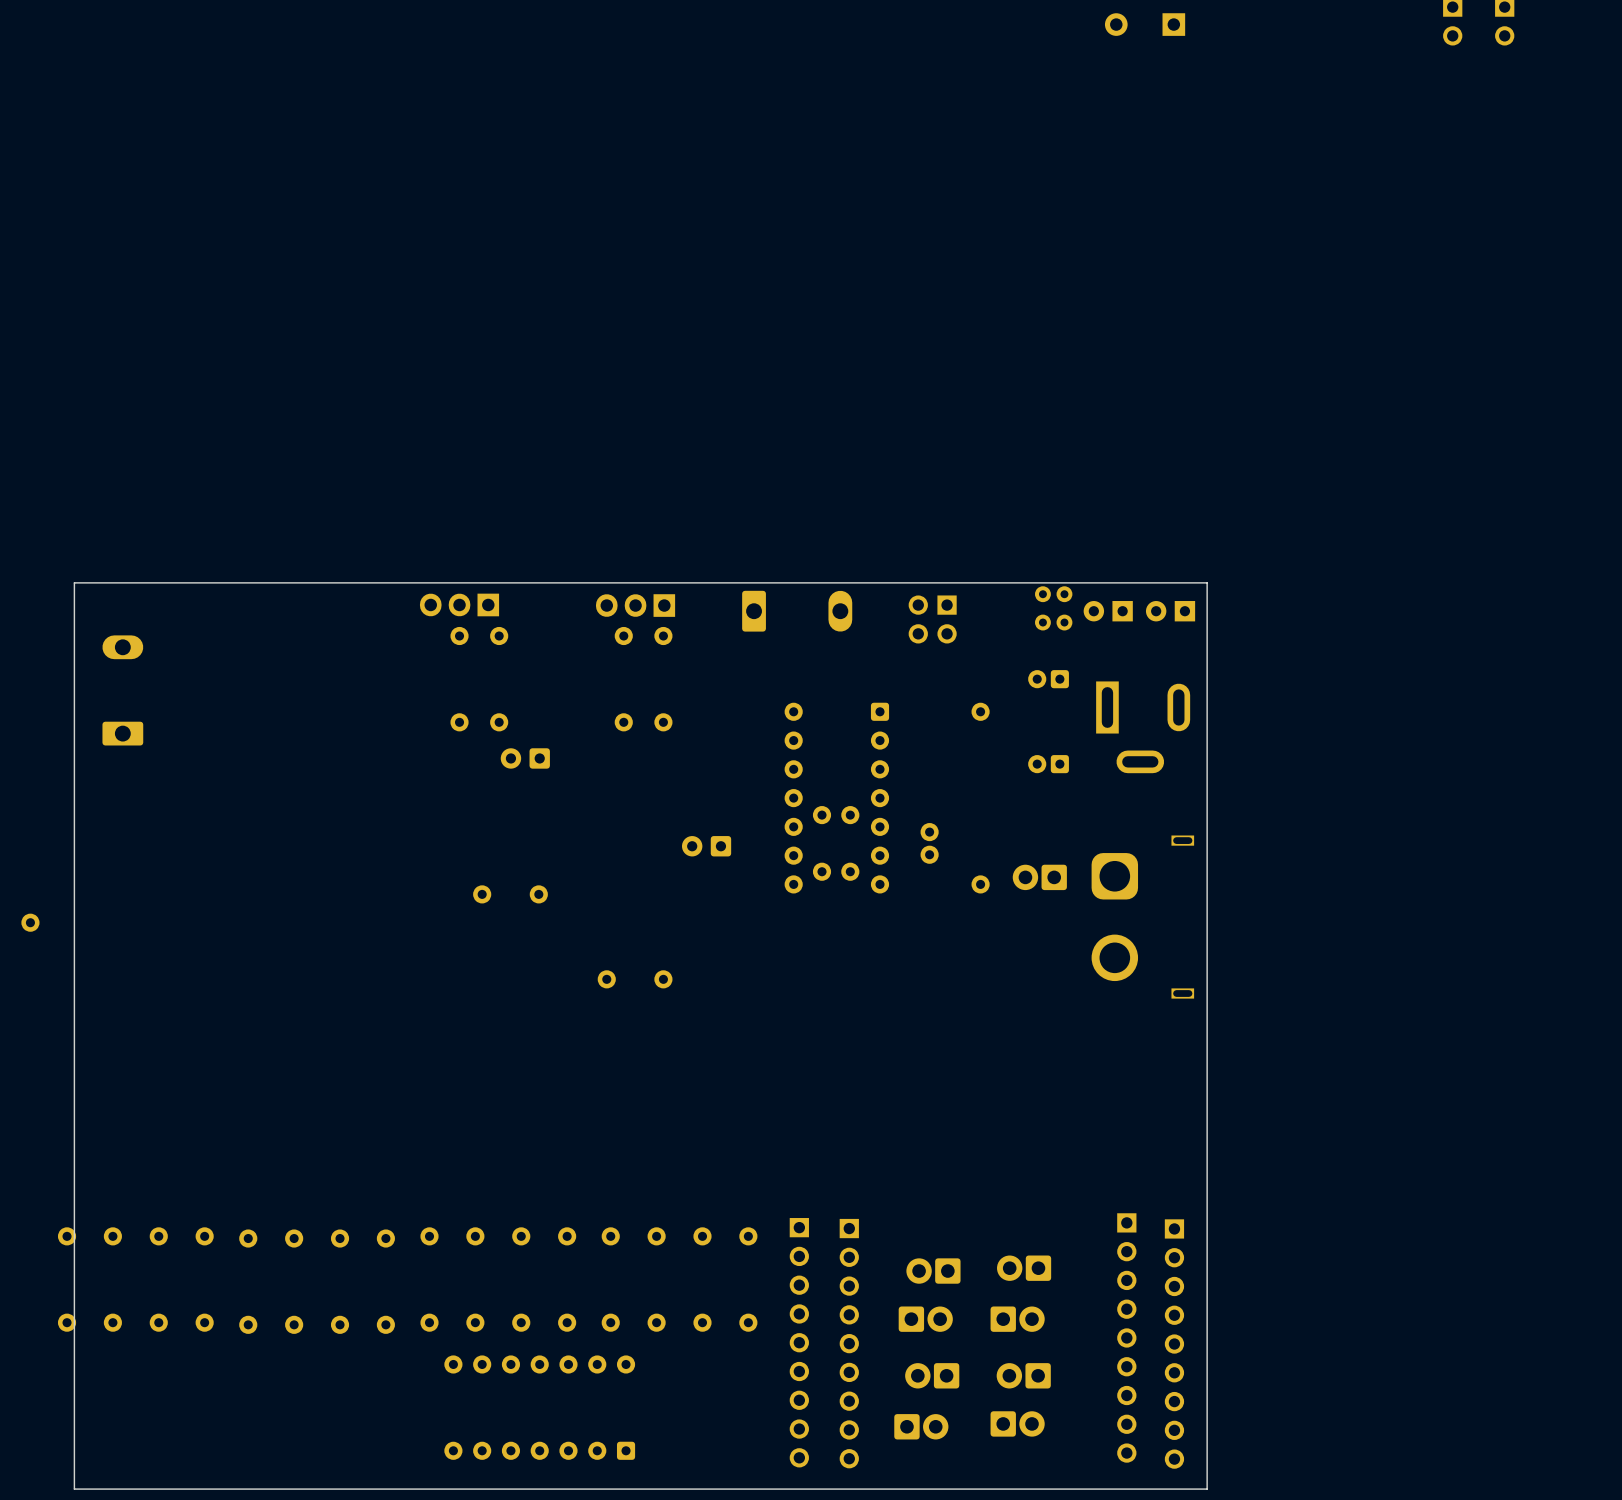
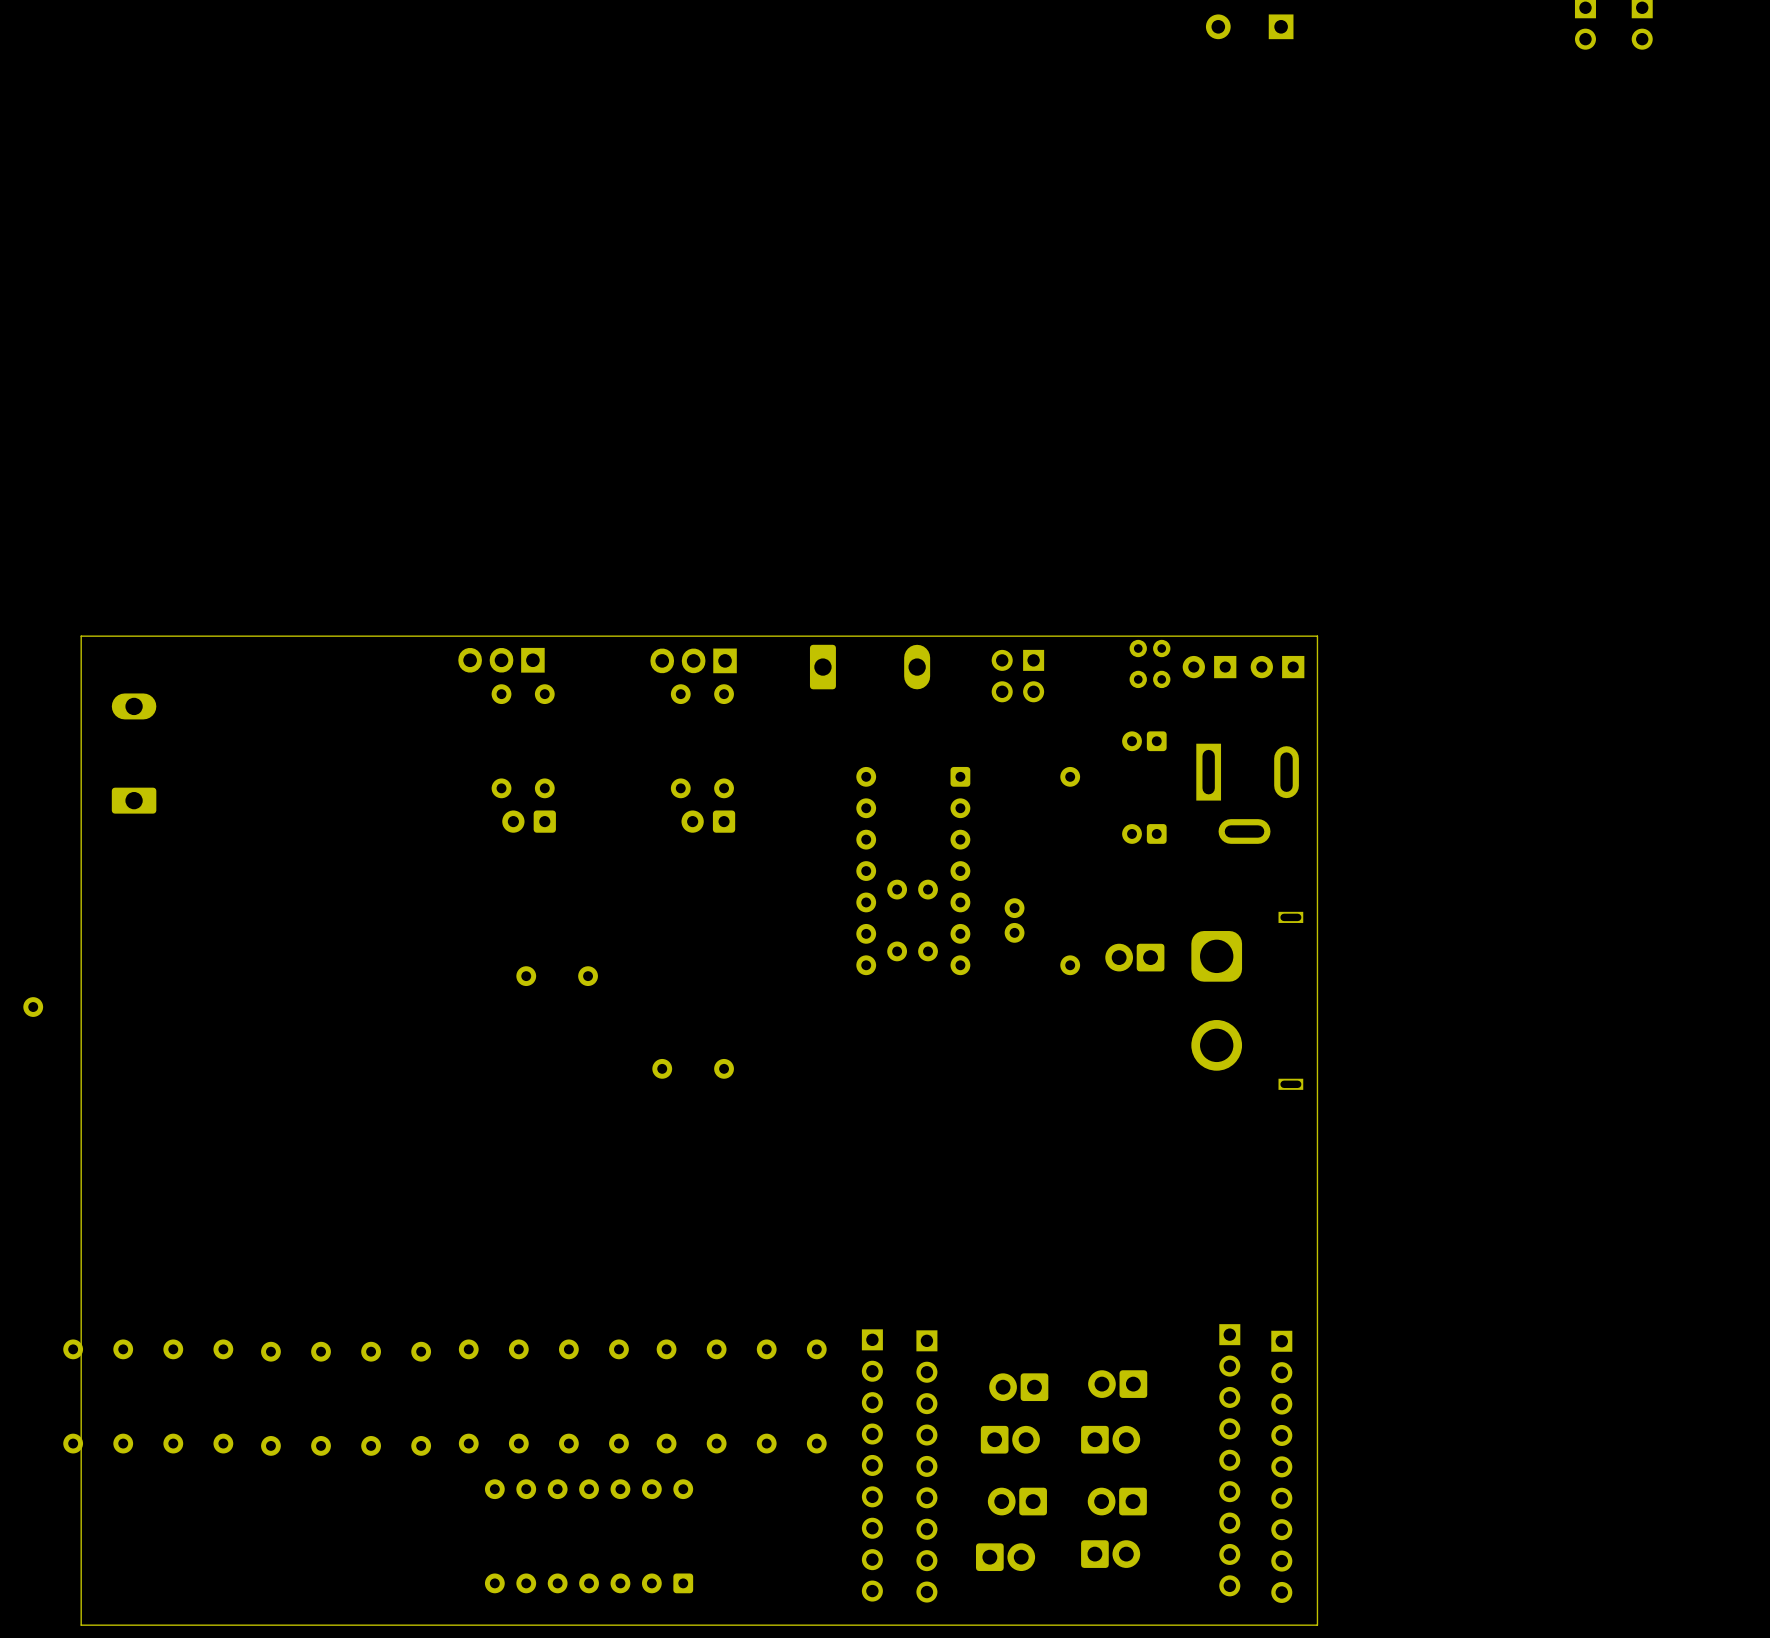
part: none -> (708, 821)
part position: (525, 758) -> (529, 821)
part: (706, 846) -> none

